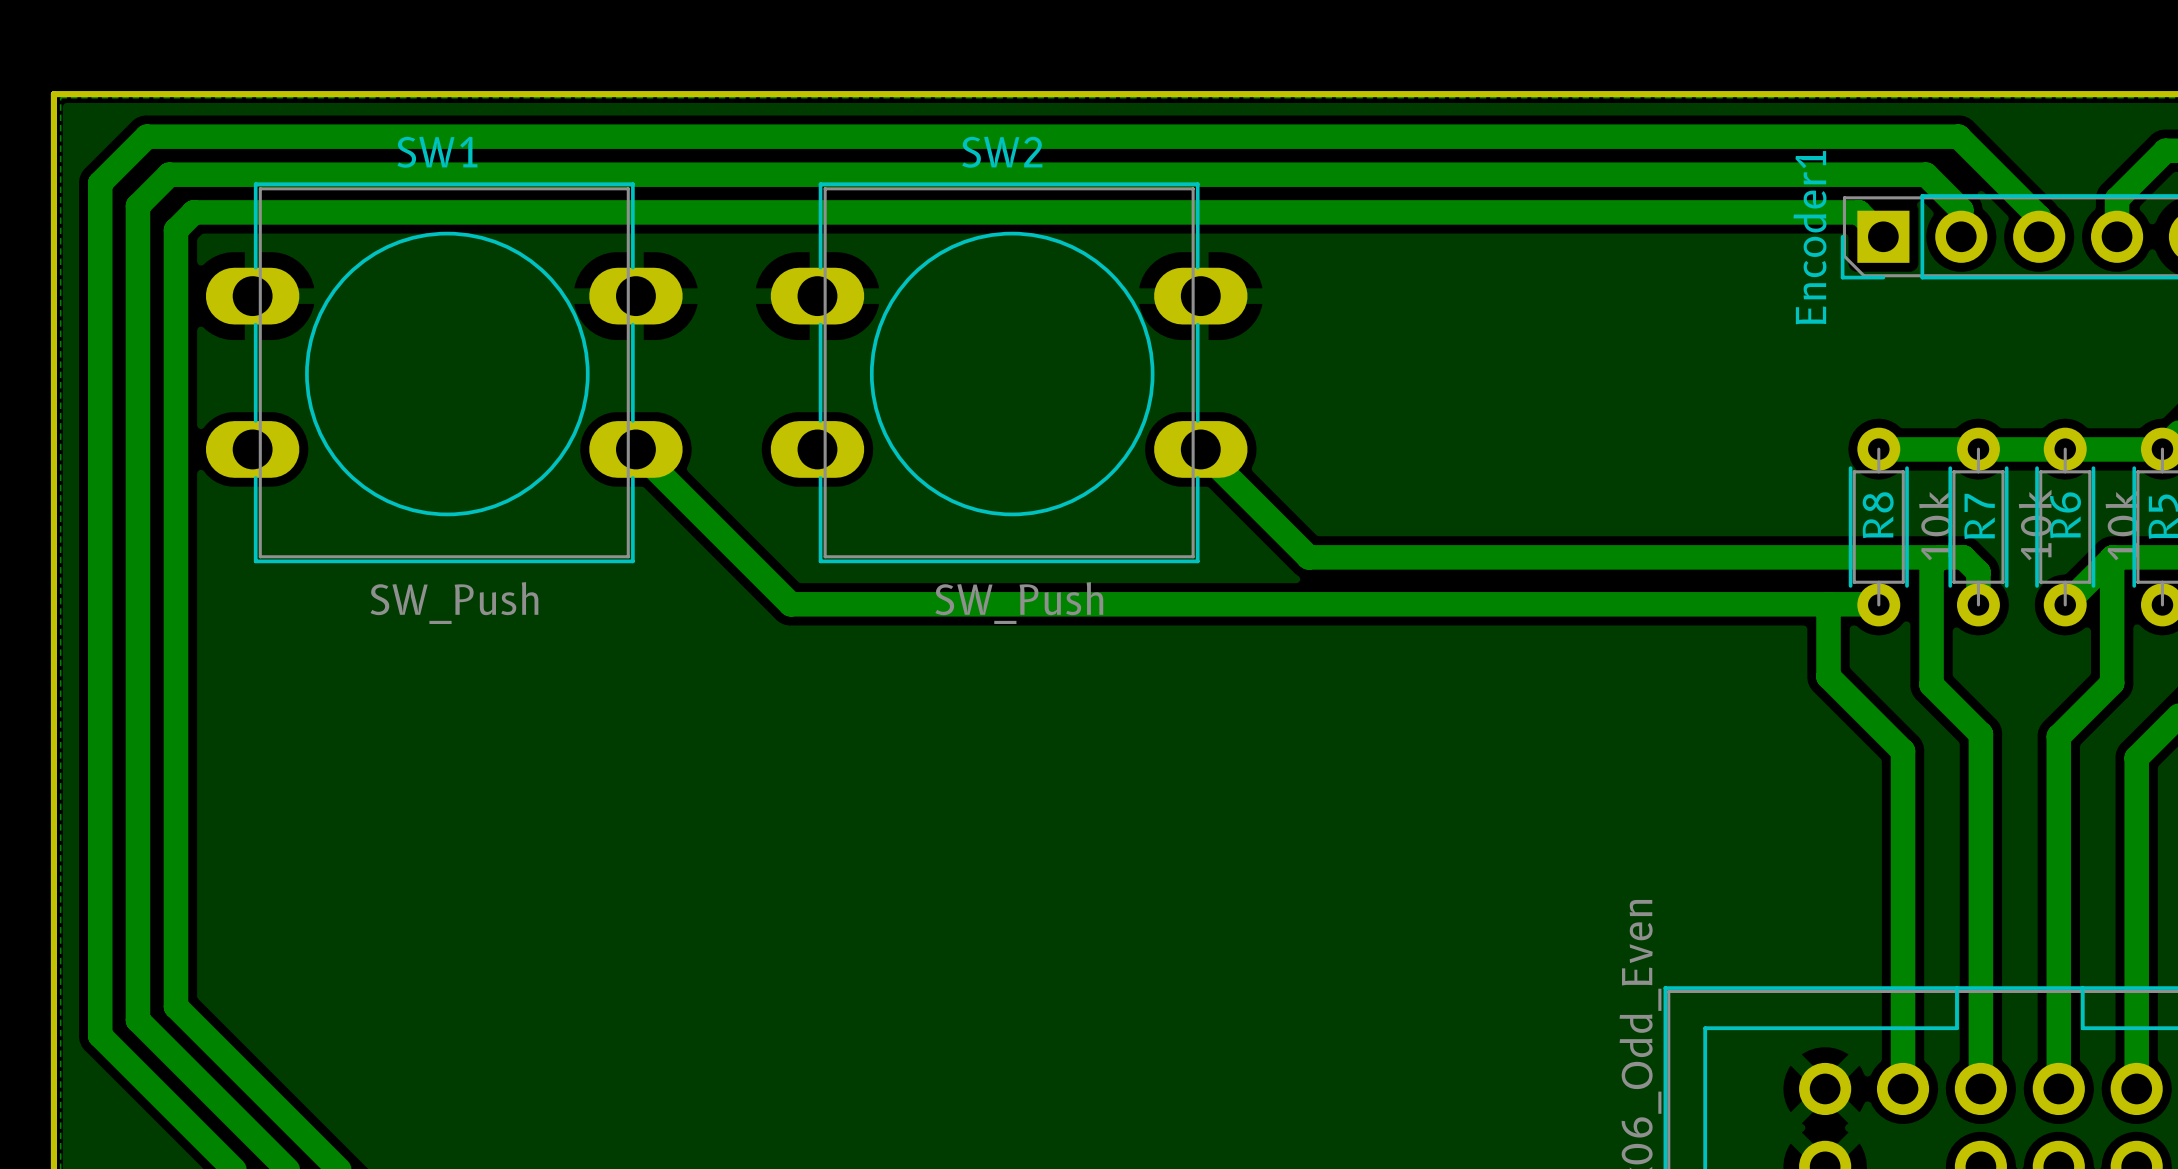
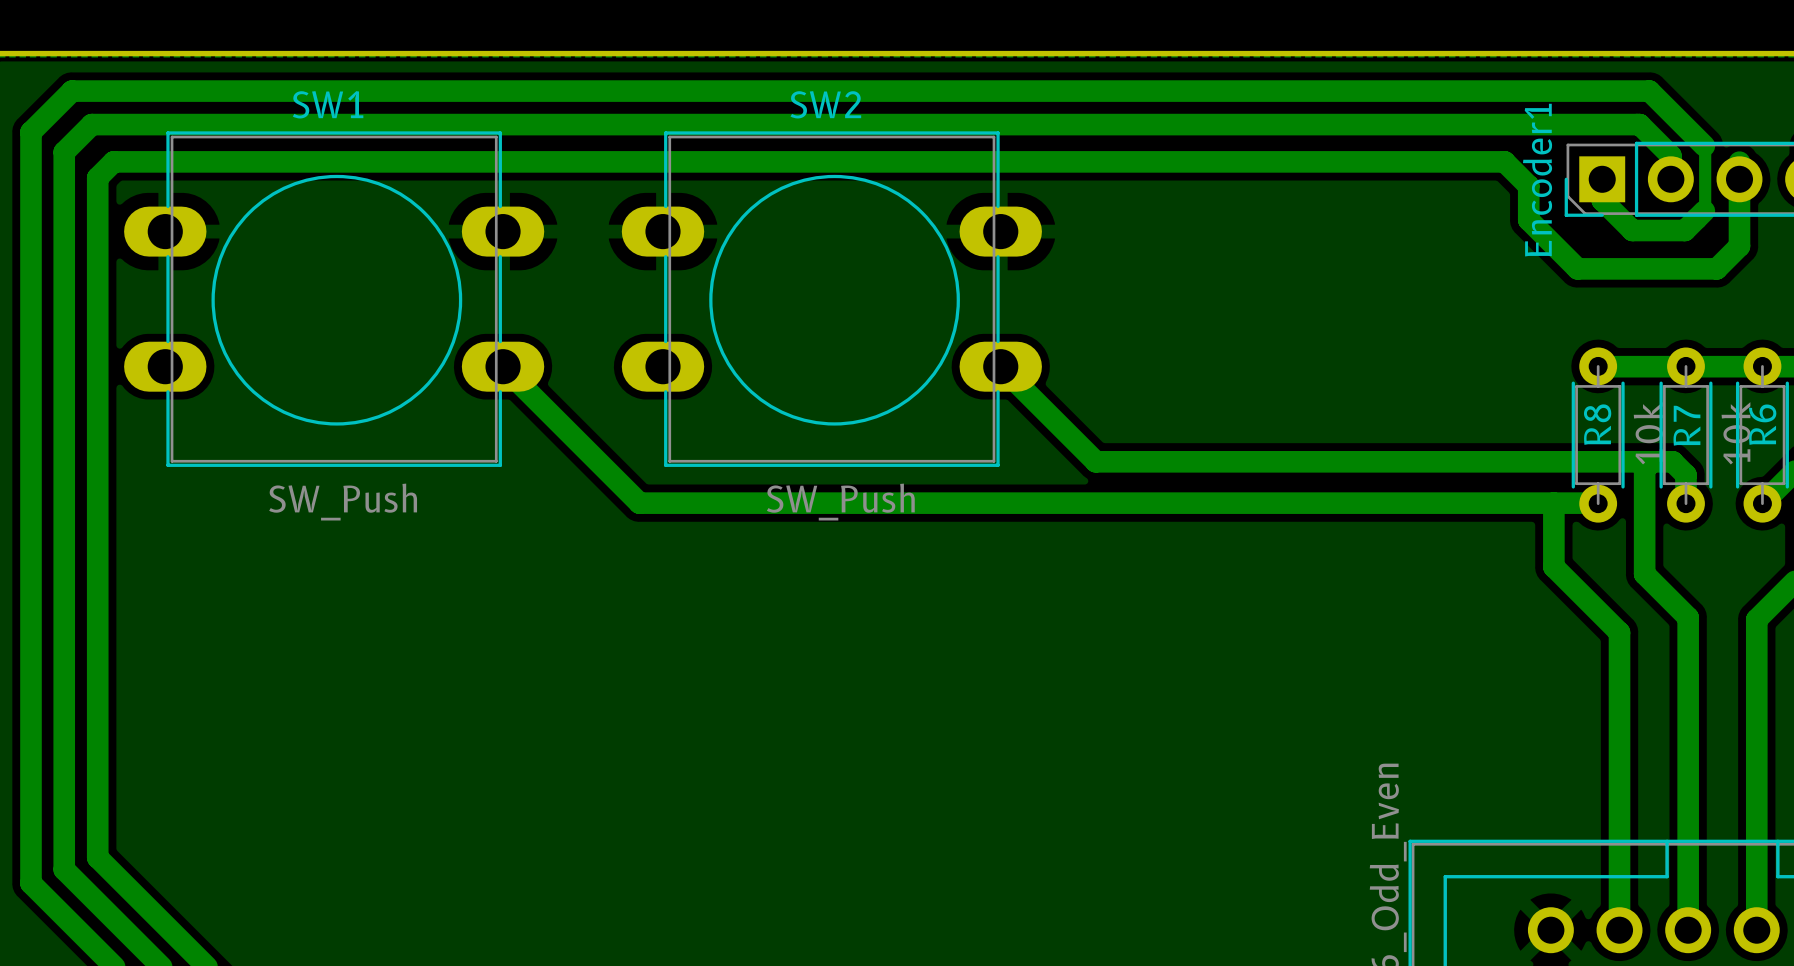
bottom track: (1937, 136) (1958, 136) (2039, 217) -> (1649, 91) (1705, 147)
bottom track: none -> (1705, 147) (1705, 209)
bottom track: (175, 235) (175, 230) (193, 212) (1859, 212) (1883, 236) -> (97, 177) (113, 161) (1504, 161) (1528, 185) (1528, 219) (1577, 268) (1716, 268) (1739, 246) (1739, 179)
bottom track: none -> (1602, 179) (1602, 200) (1632, 230) (1684, 230) (1705, 209)

